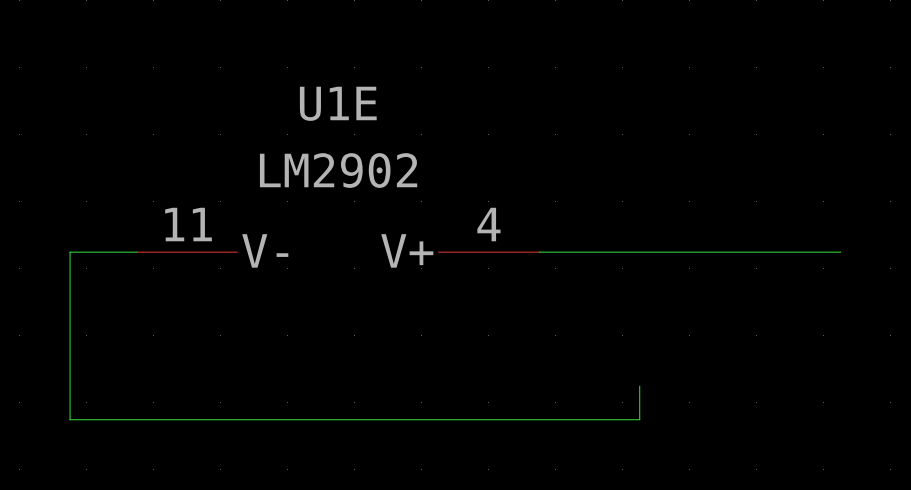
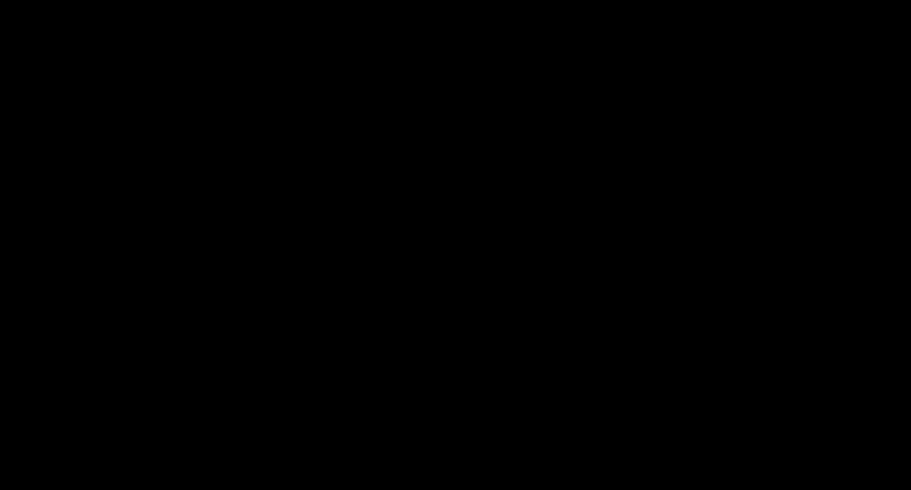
wire: (137, 252) (70, 252) (70, 419) (639, 419) (639, 386) -> none
U1E: LM2902 (338, 252) -> none
wire: (539, 252) (840, 252) -> none

